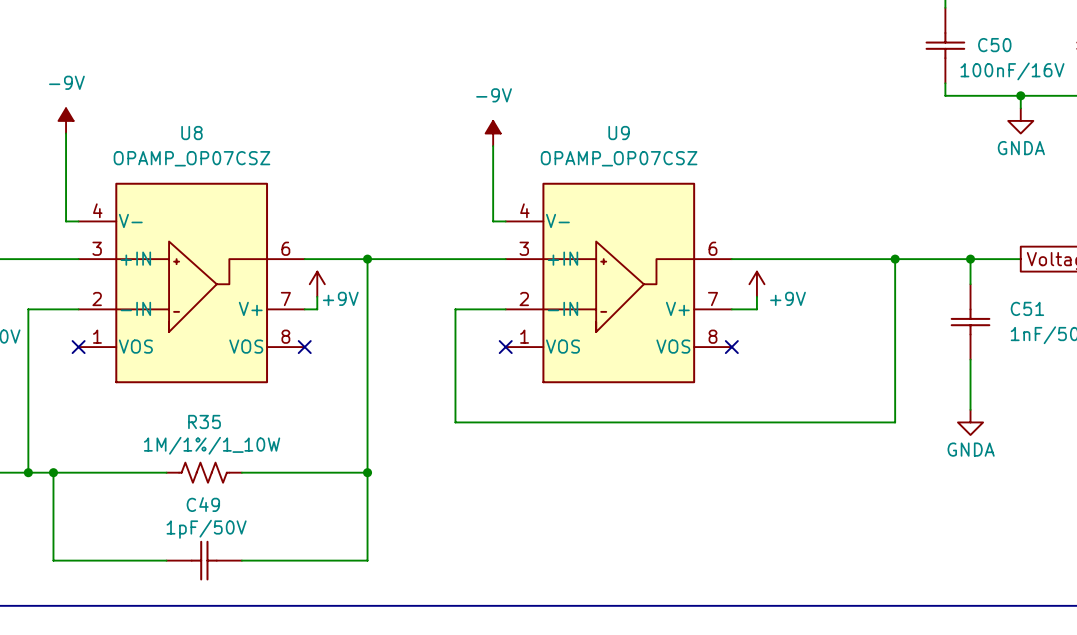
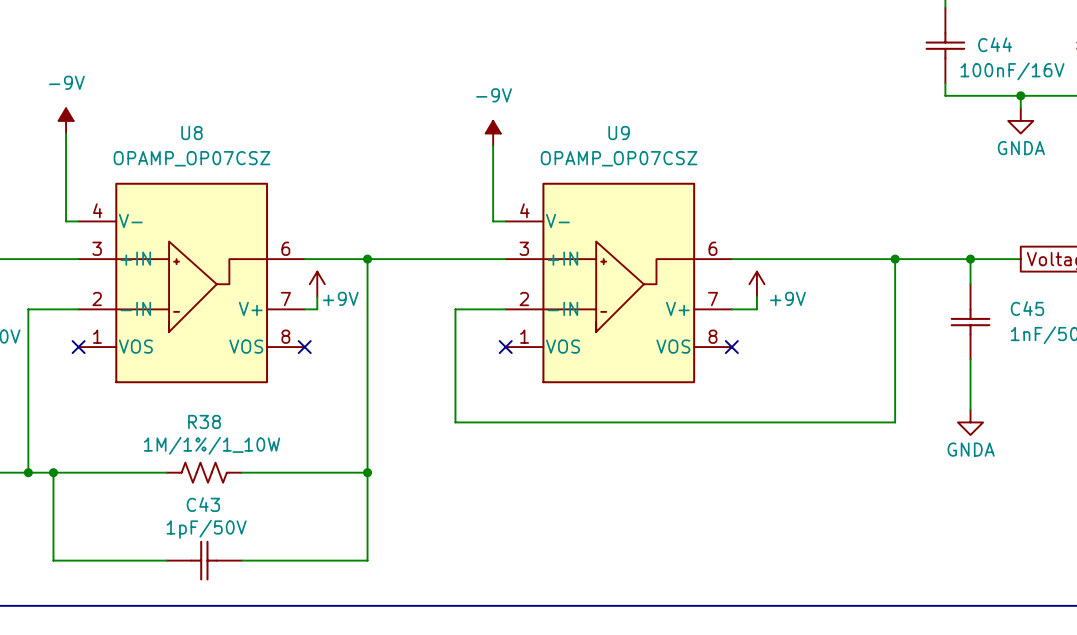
C50 name: C50 (994, 45) -> C44 (995, 44)
C51 name: C51 (1027, 308) -> C45 (1027, 308)
R35 name: R35 (204, 421) -> R38 (204, 421)
C49 name: C49 (203, 504) -> C43 (203, 504)

